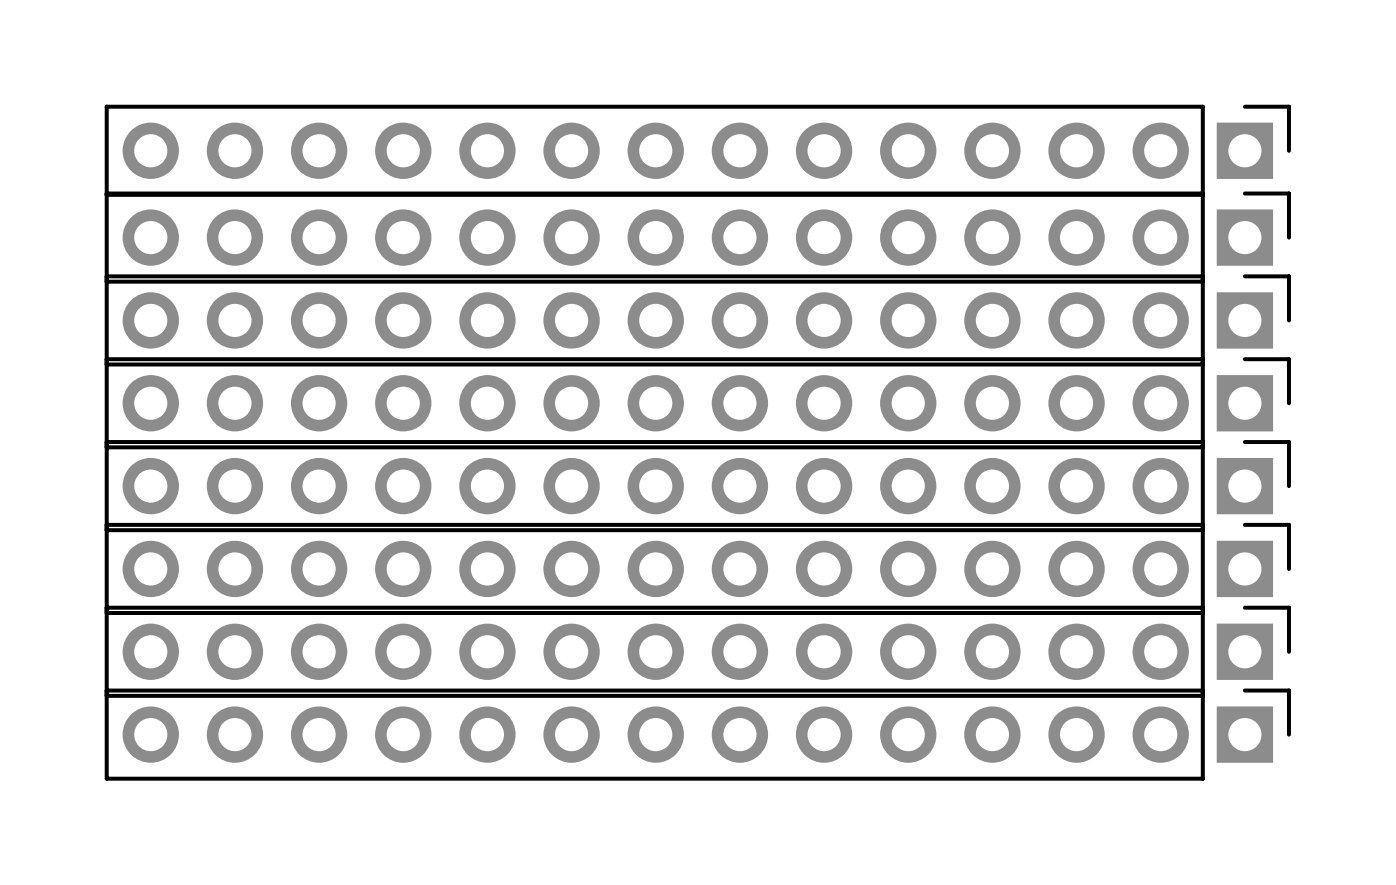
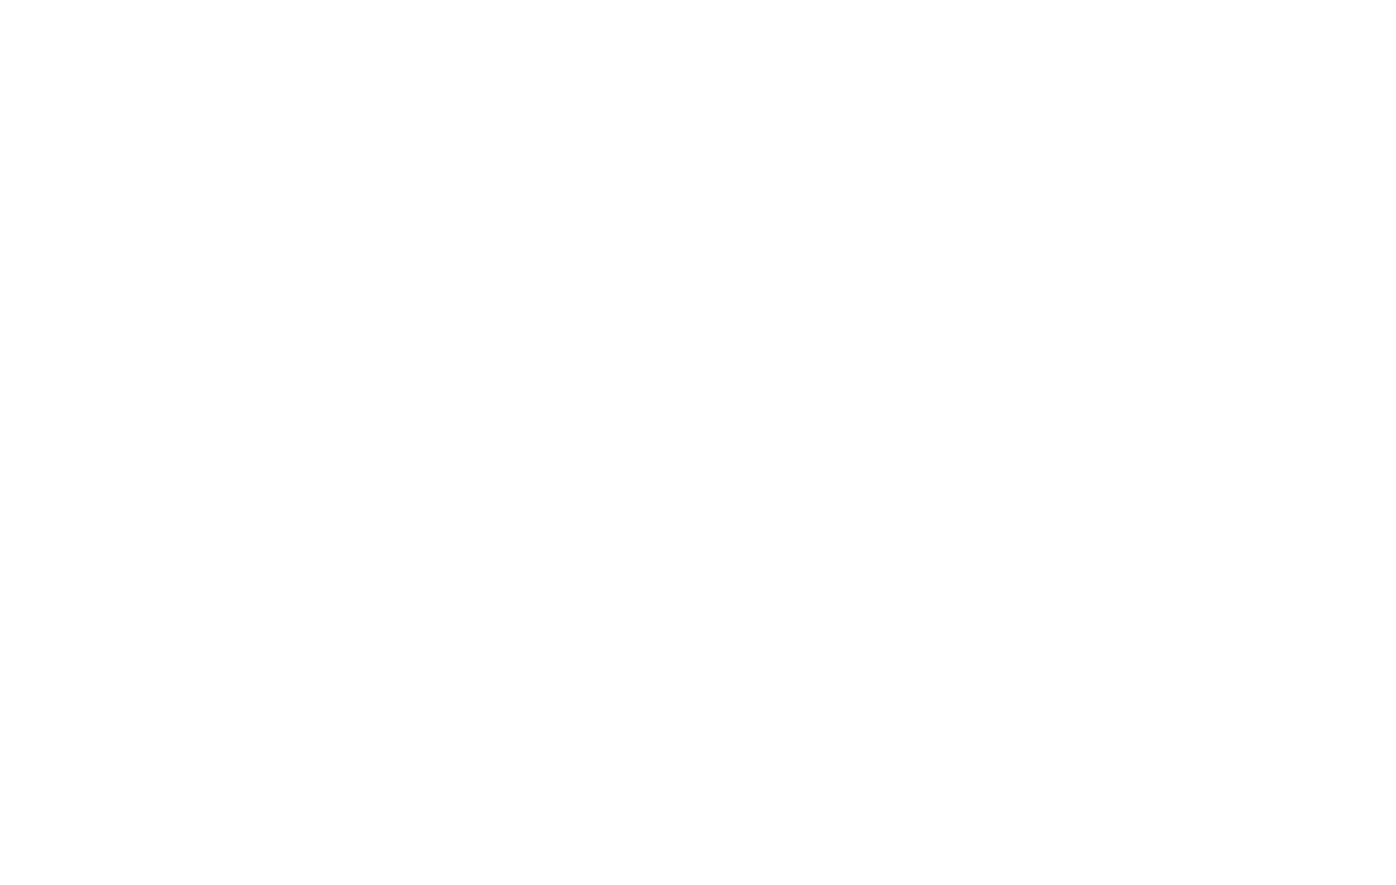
part: (697, 150) -> none
part: (697, 237) -> none
part: (697, 320) -> none
part: (697, 403) -> none
part: (697, 486) -> none
part: (697, 568) -> none
part: (697, 651) -> none
part: (697, 734) -> none

